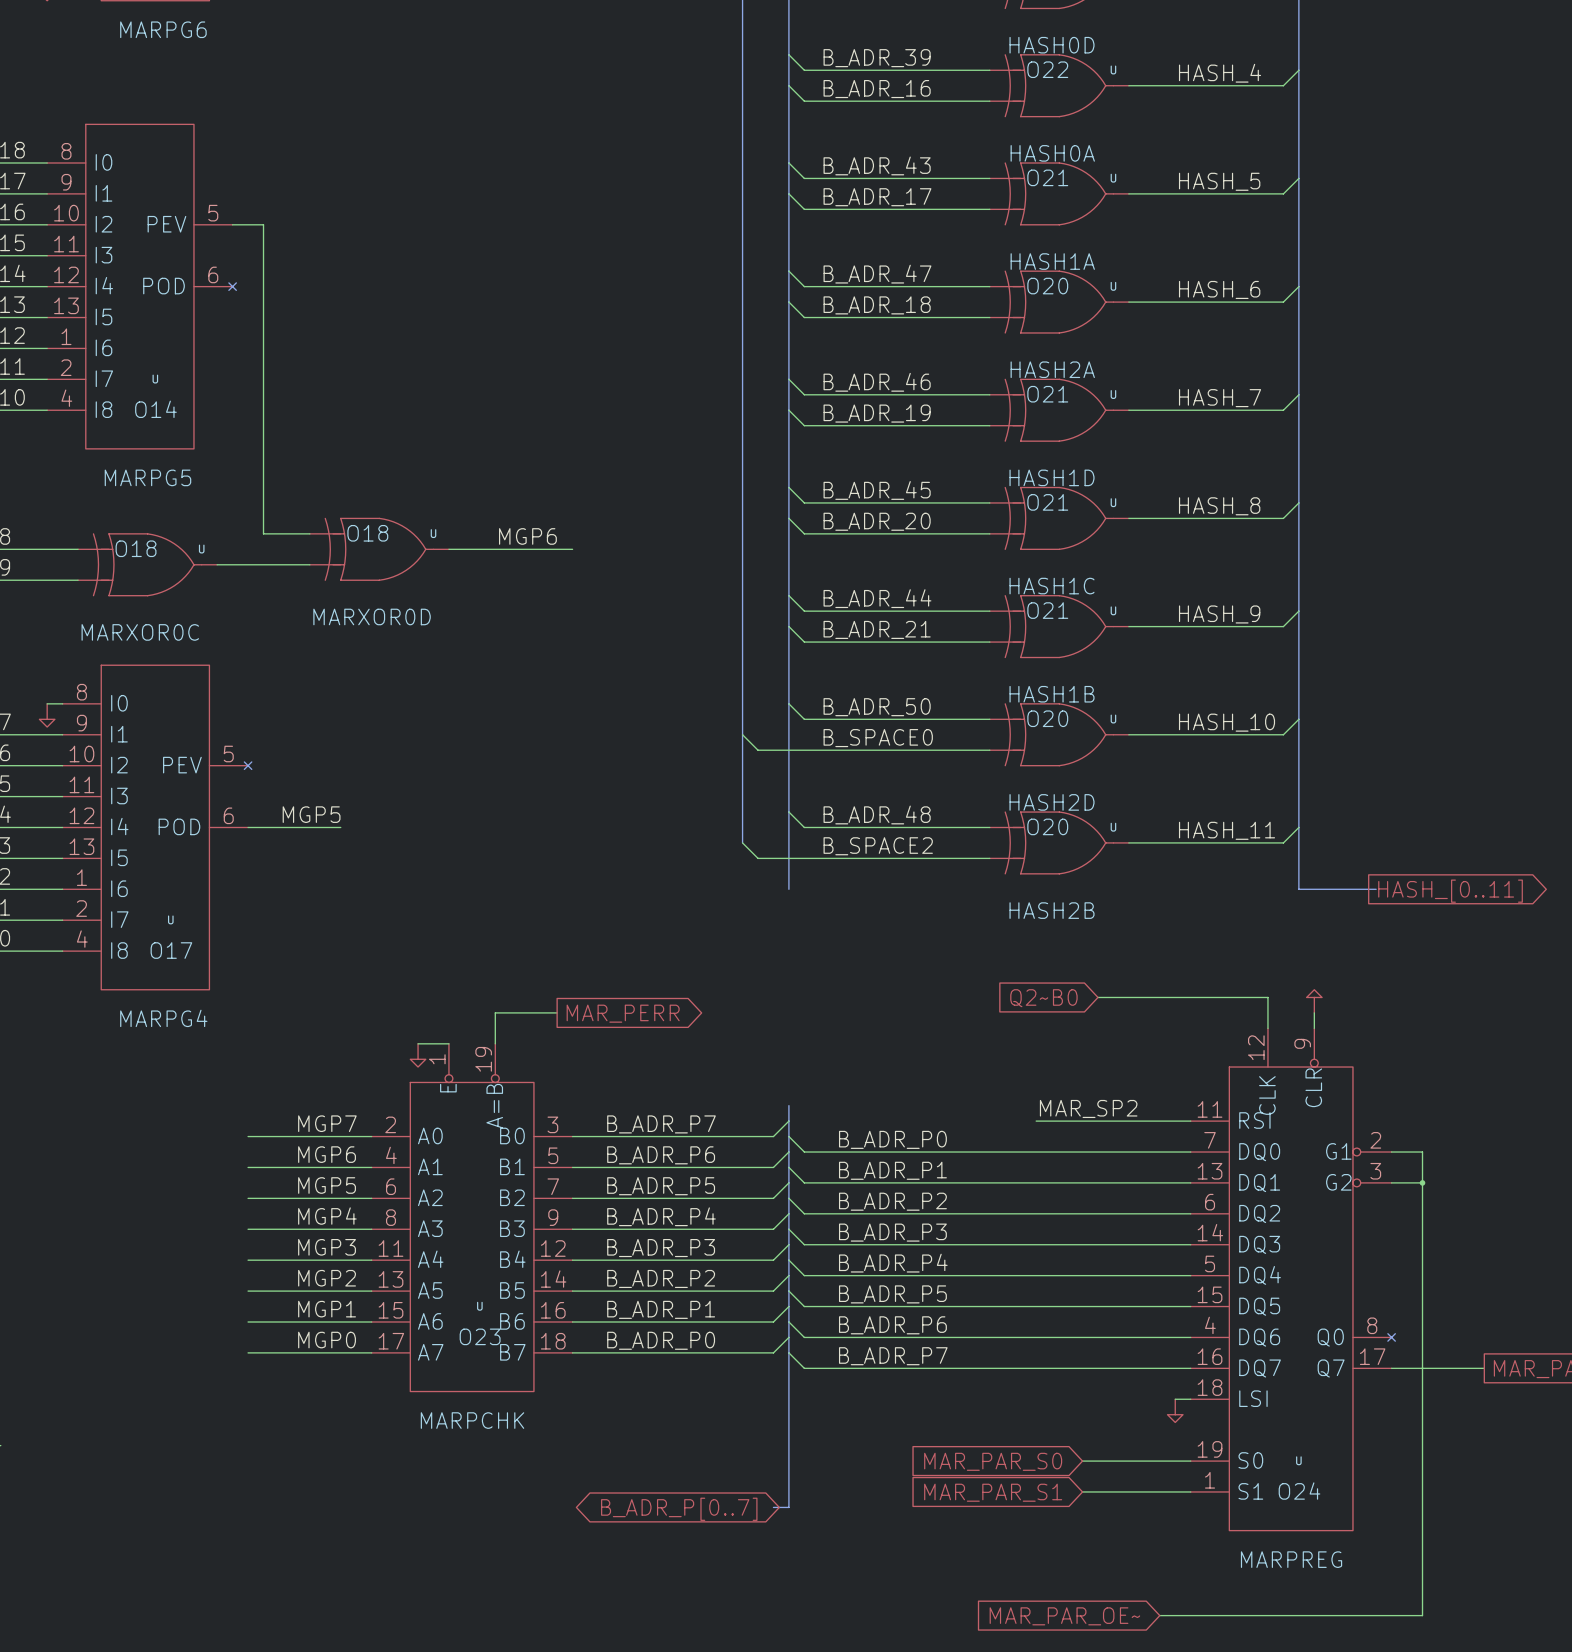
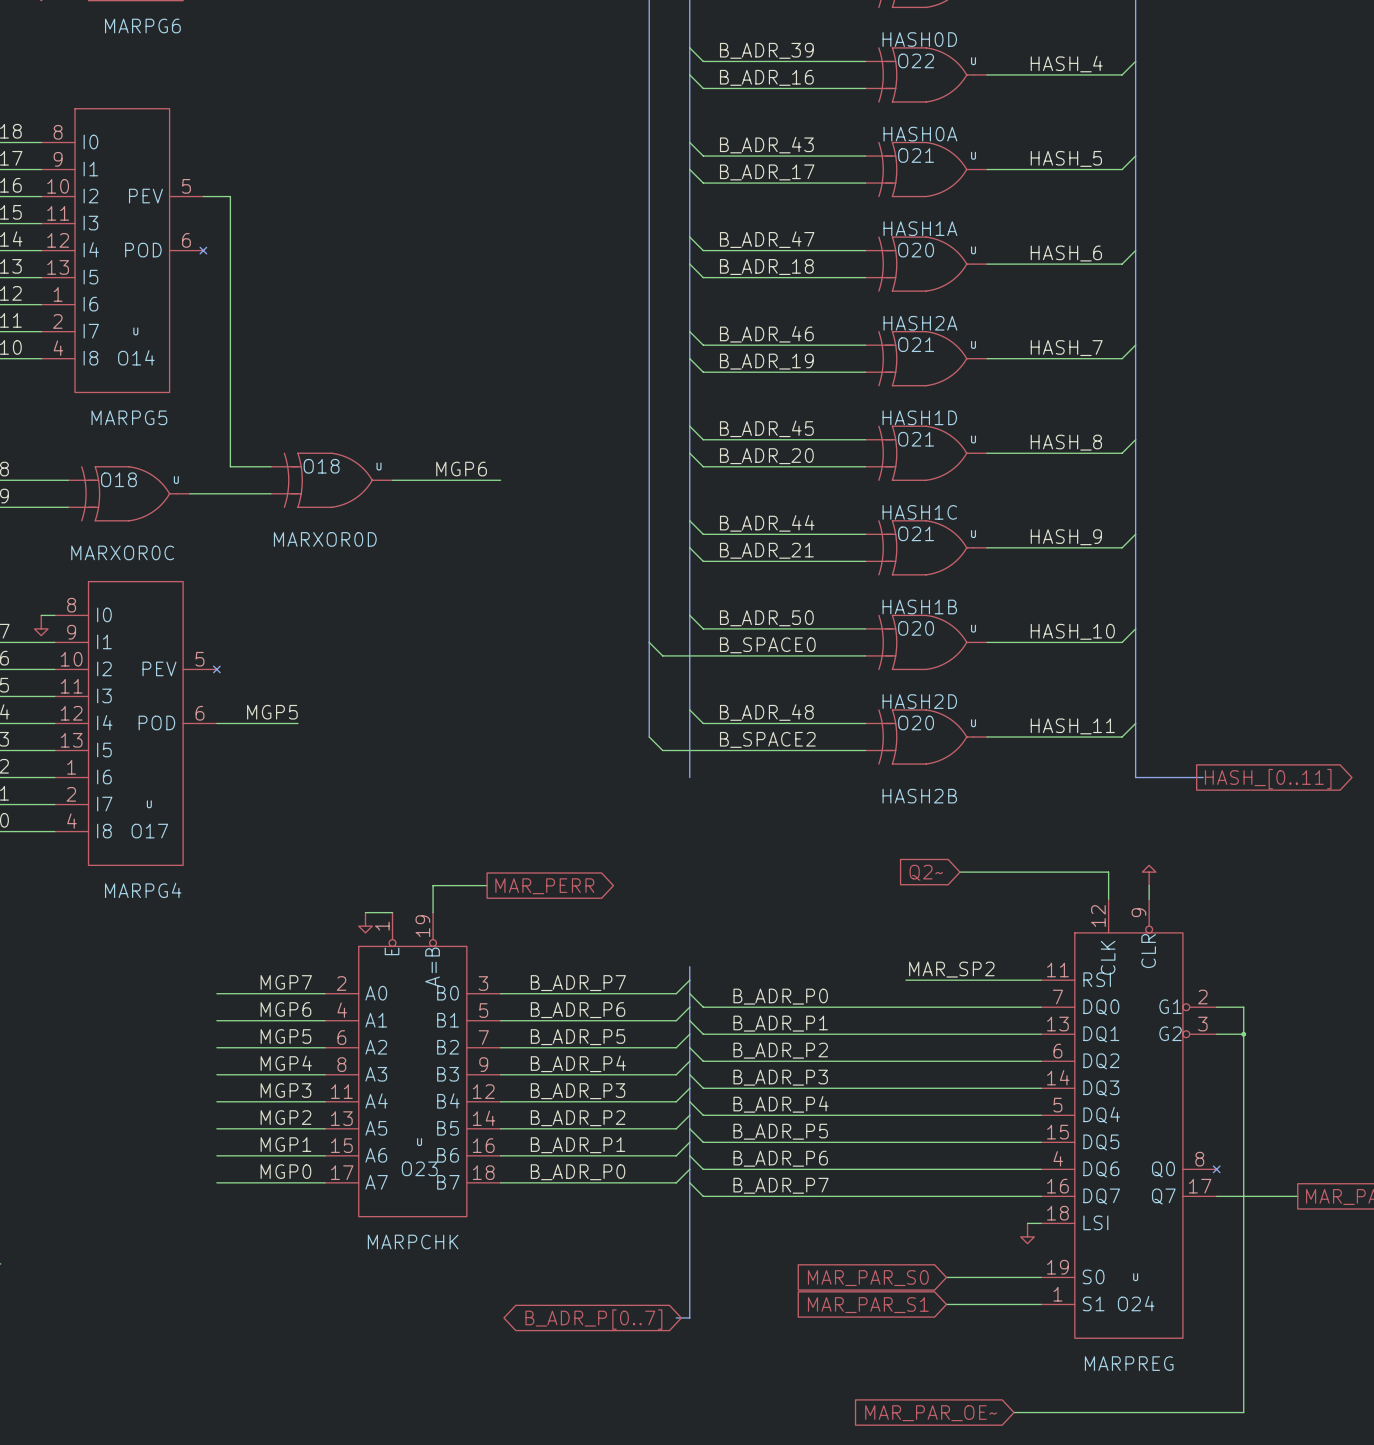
global label: Q2~B0 (1043, 998) -> Q2~ (926, 872)

